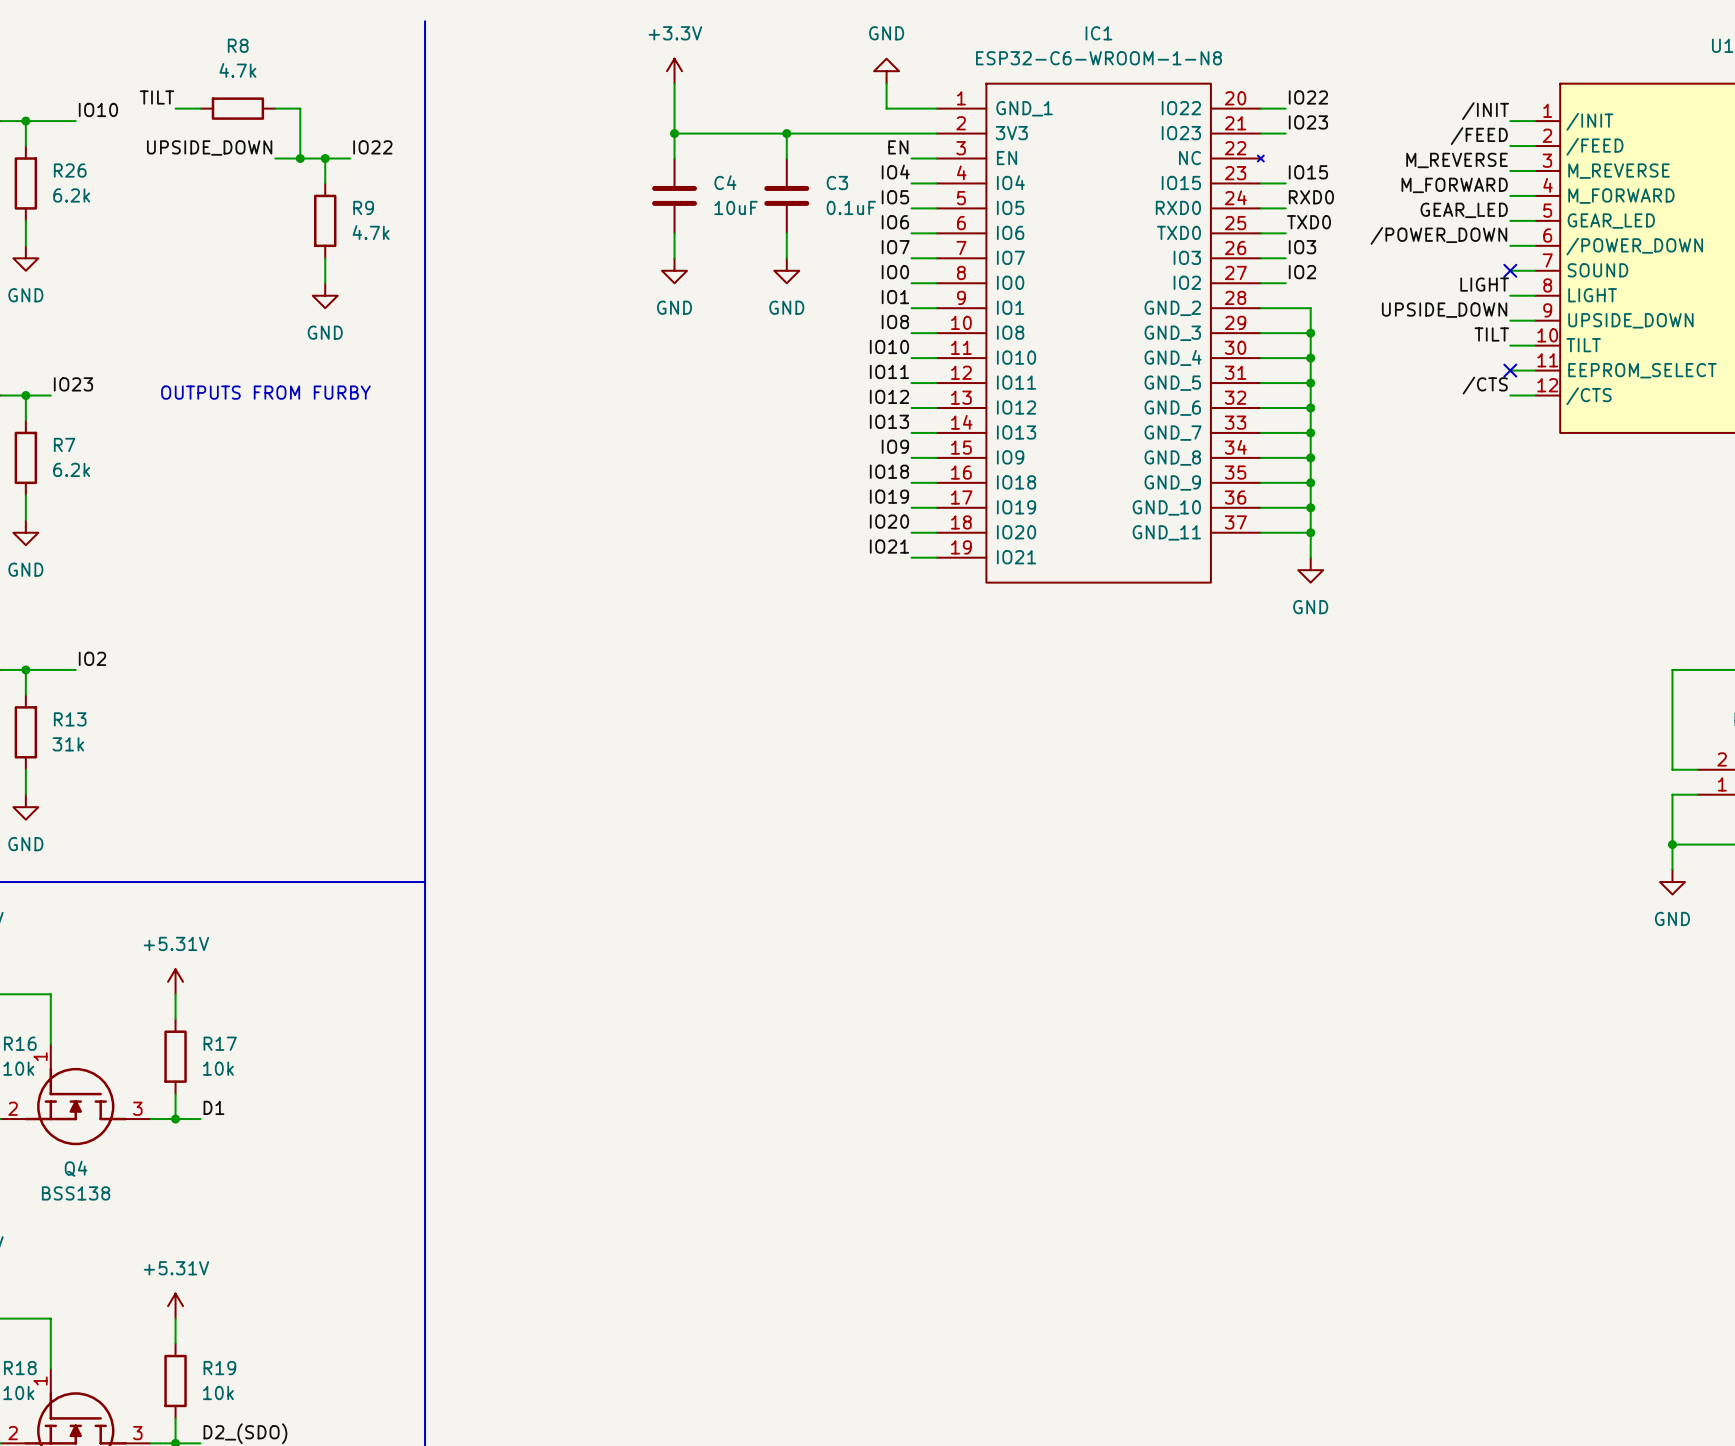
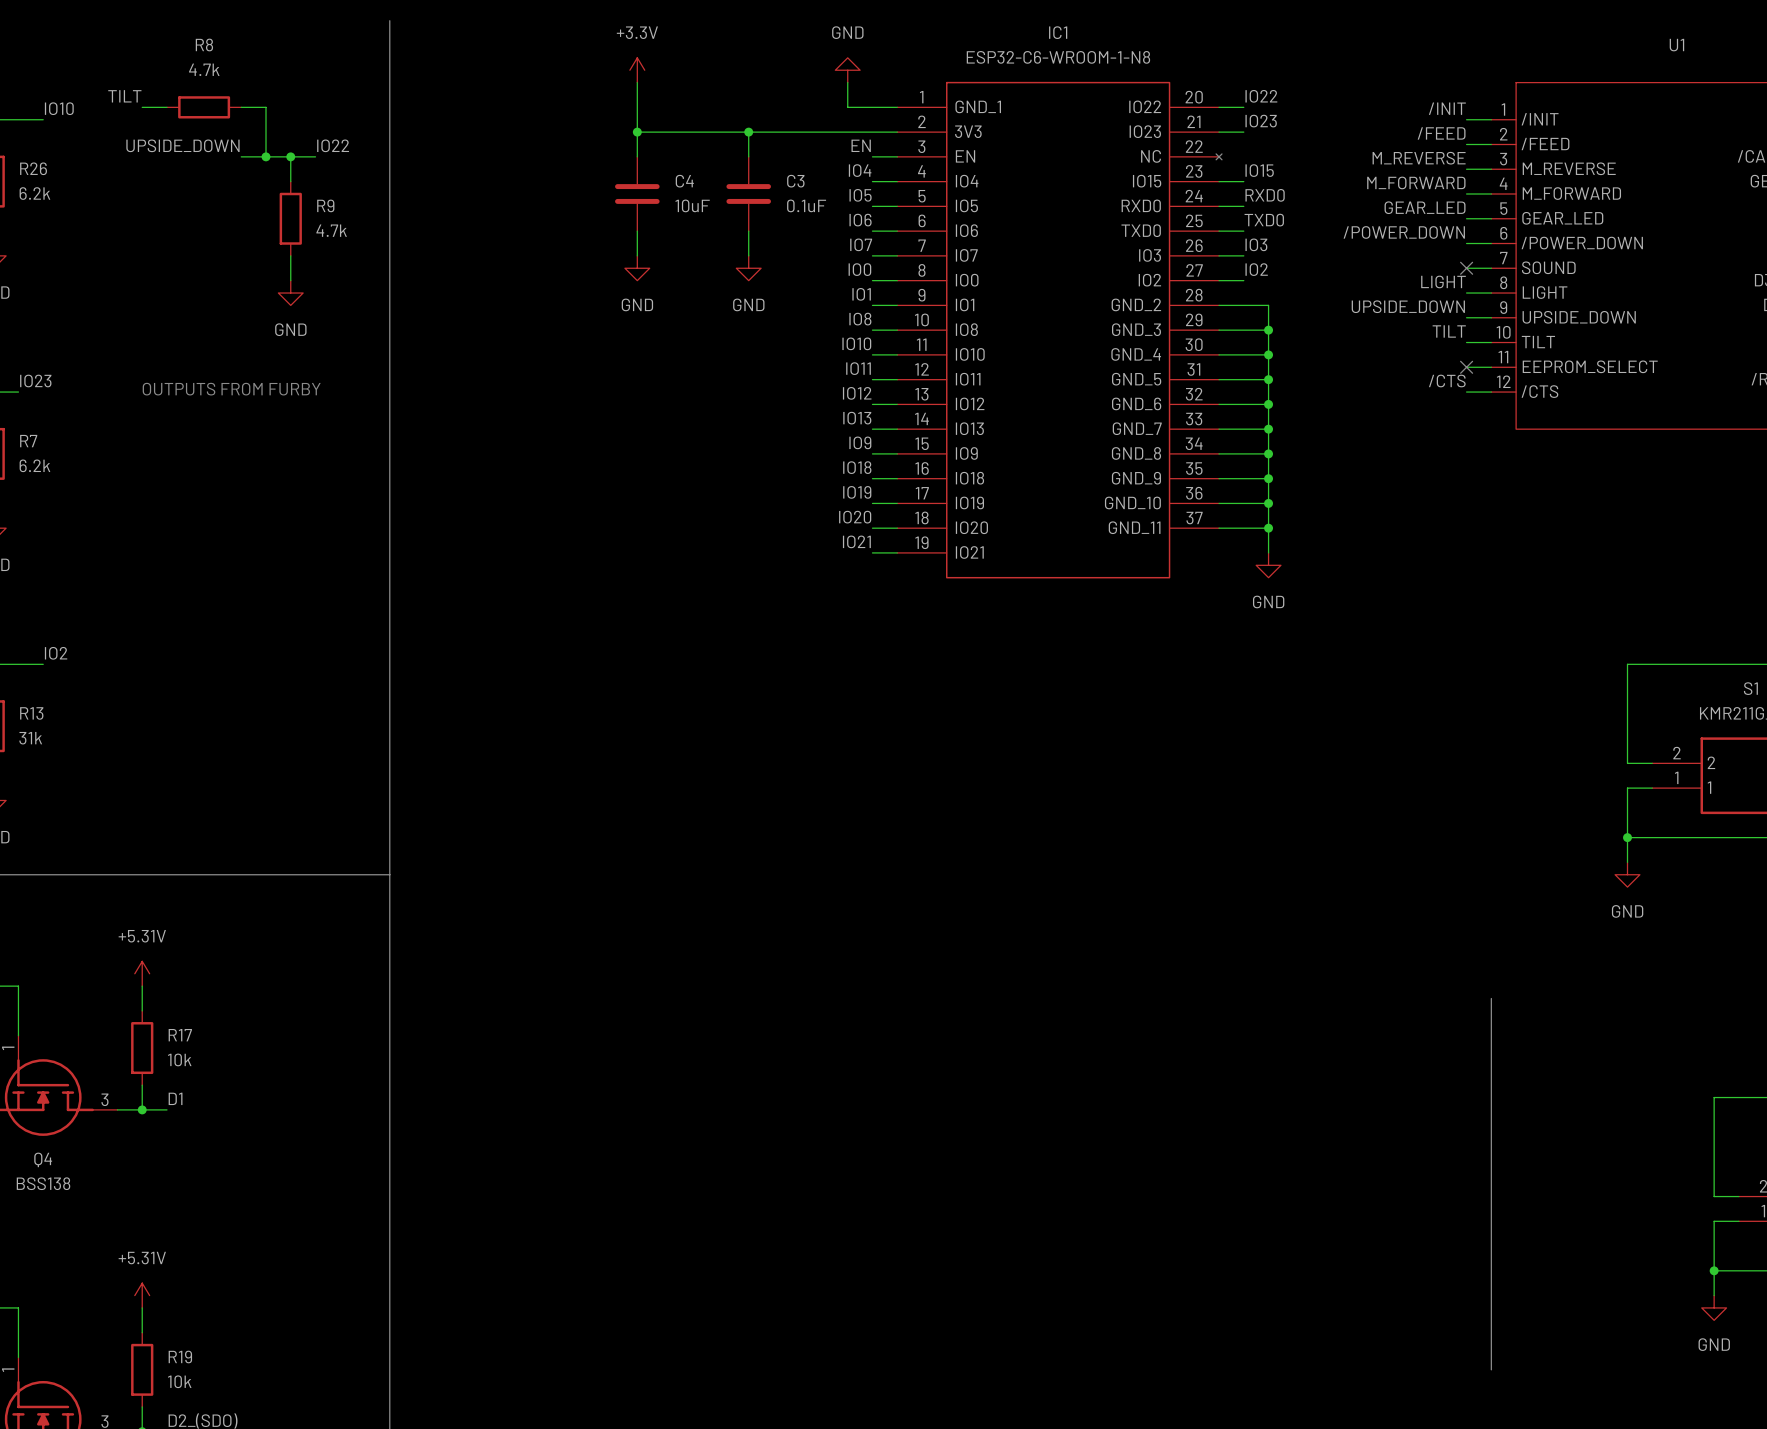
line: none -> (1491, 998) (1491, 1369)

